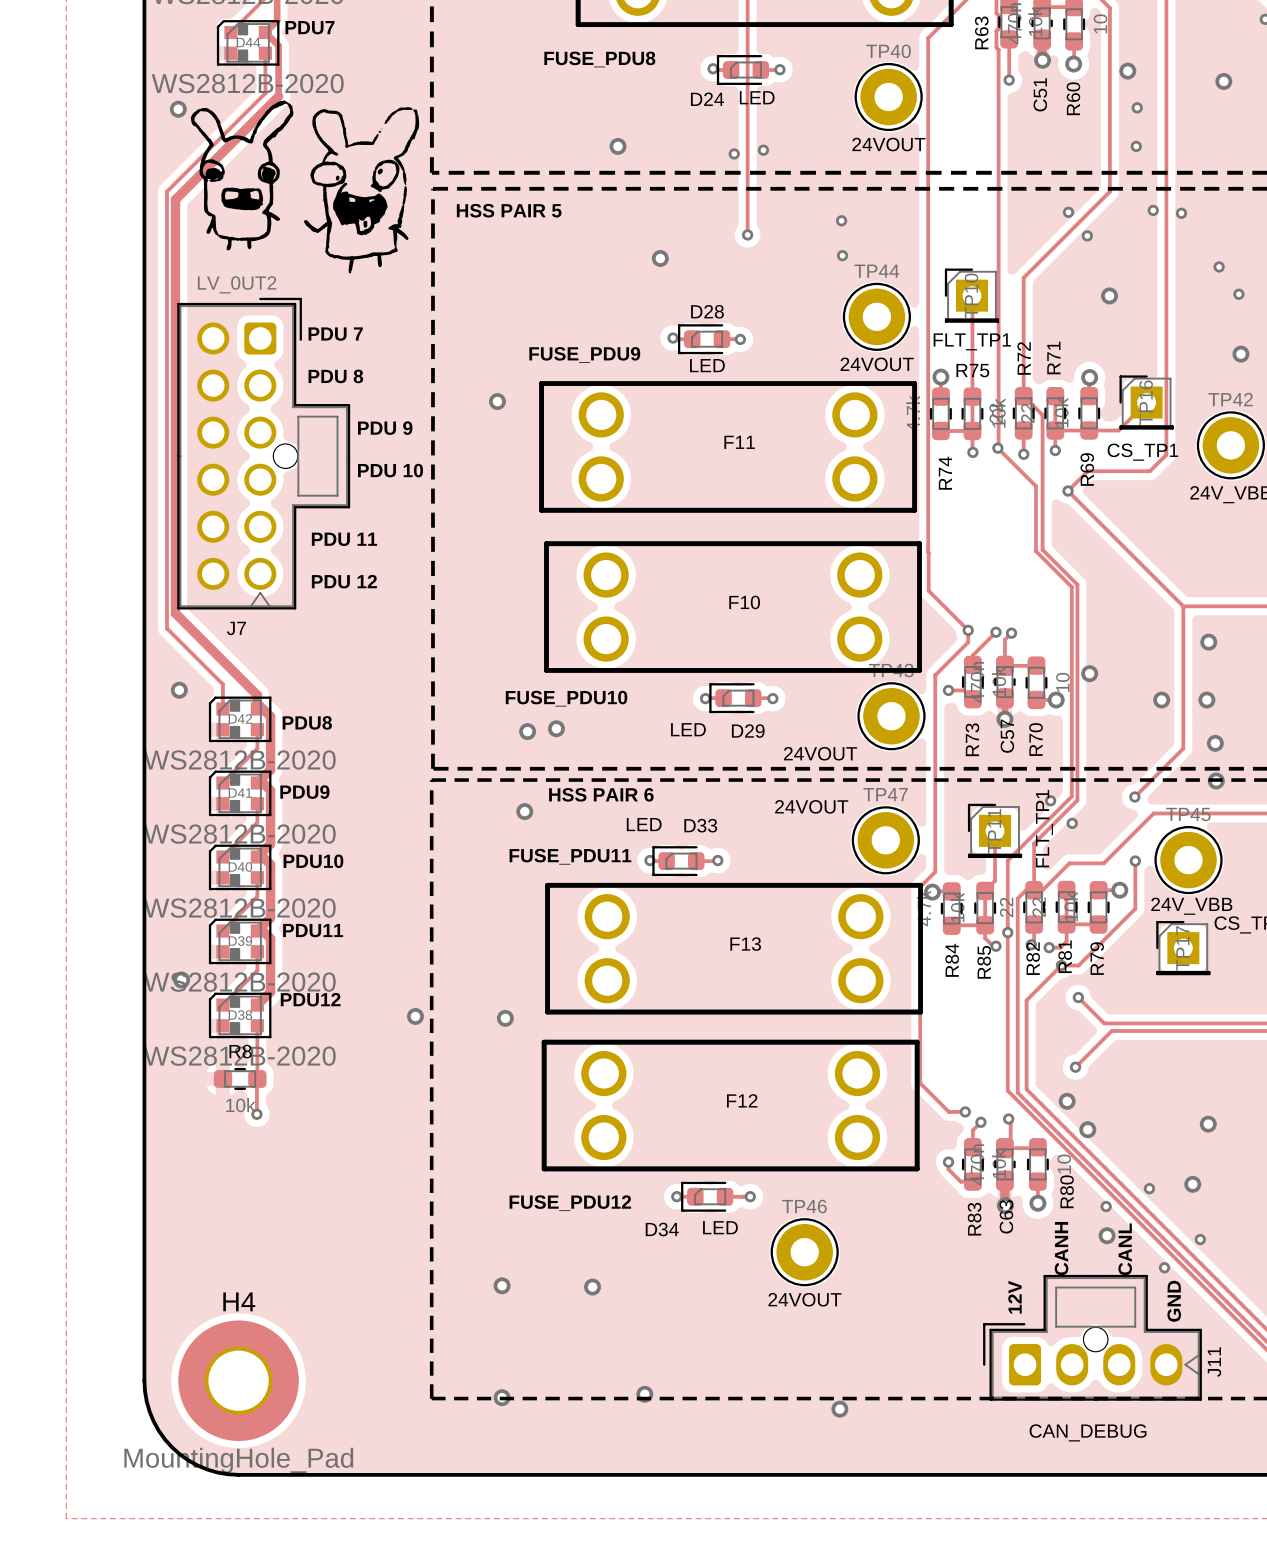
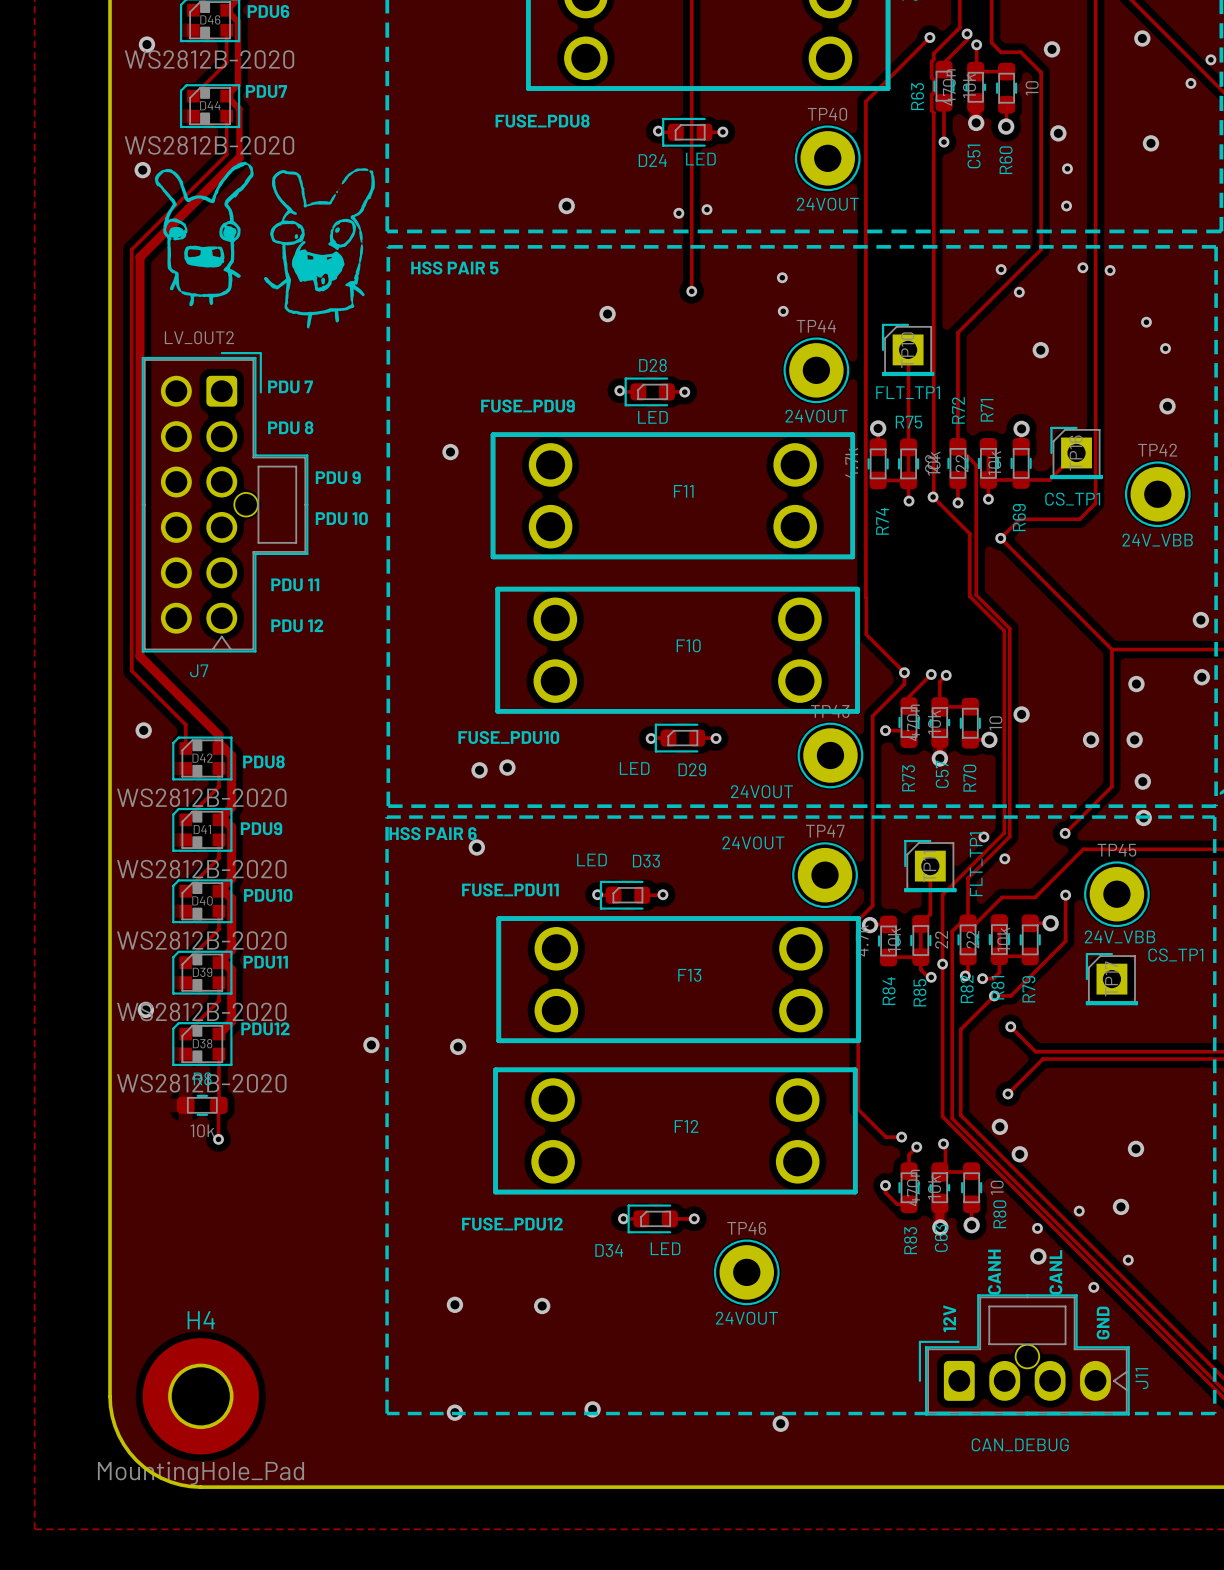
text position: HSS PAIR 6 (601, 794) -> HSS PAIR 6 (433, 833)

